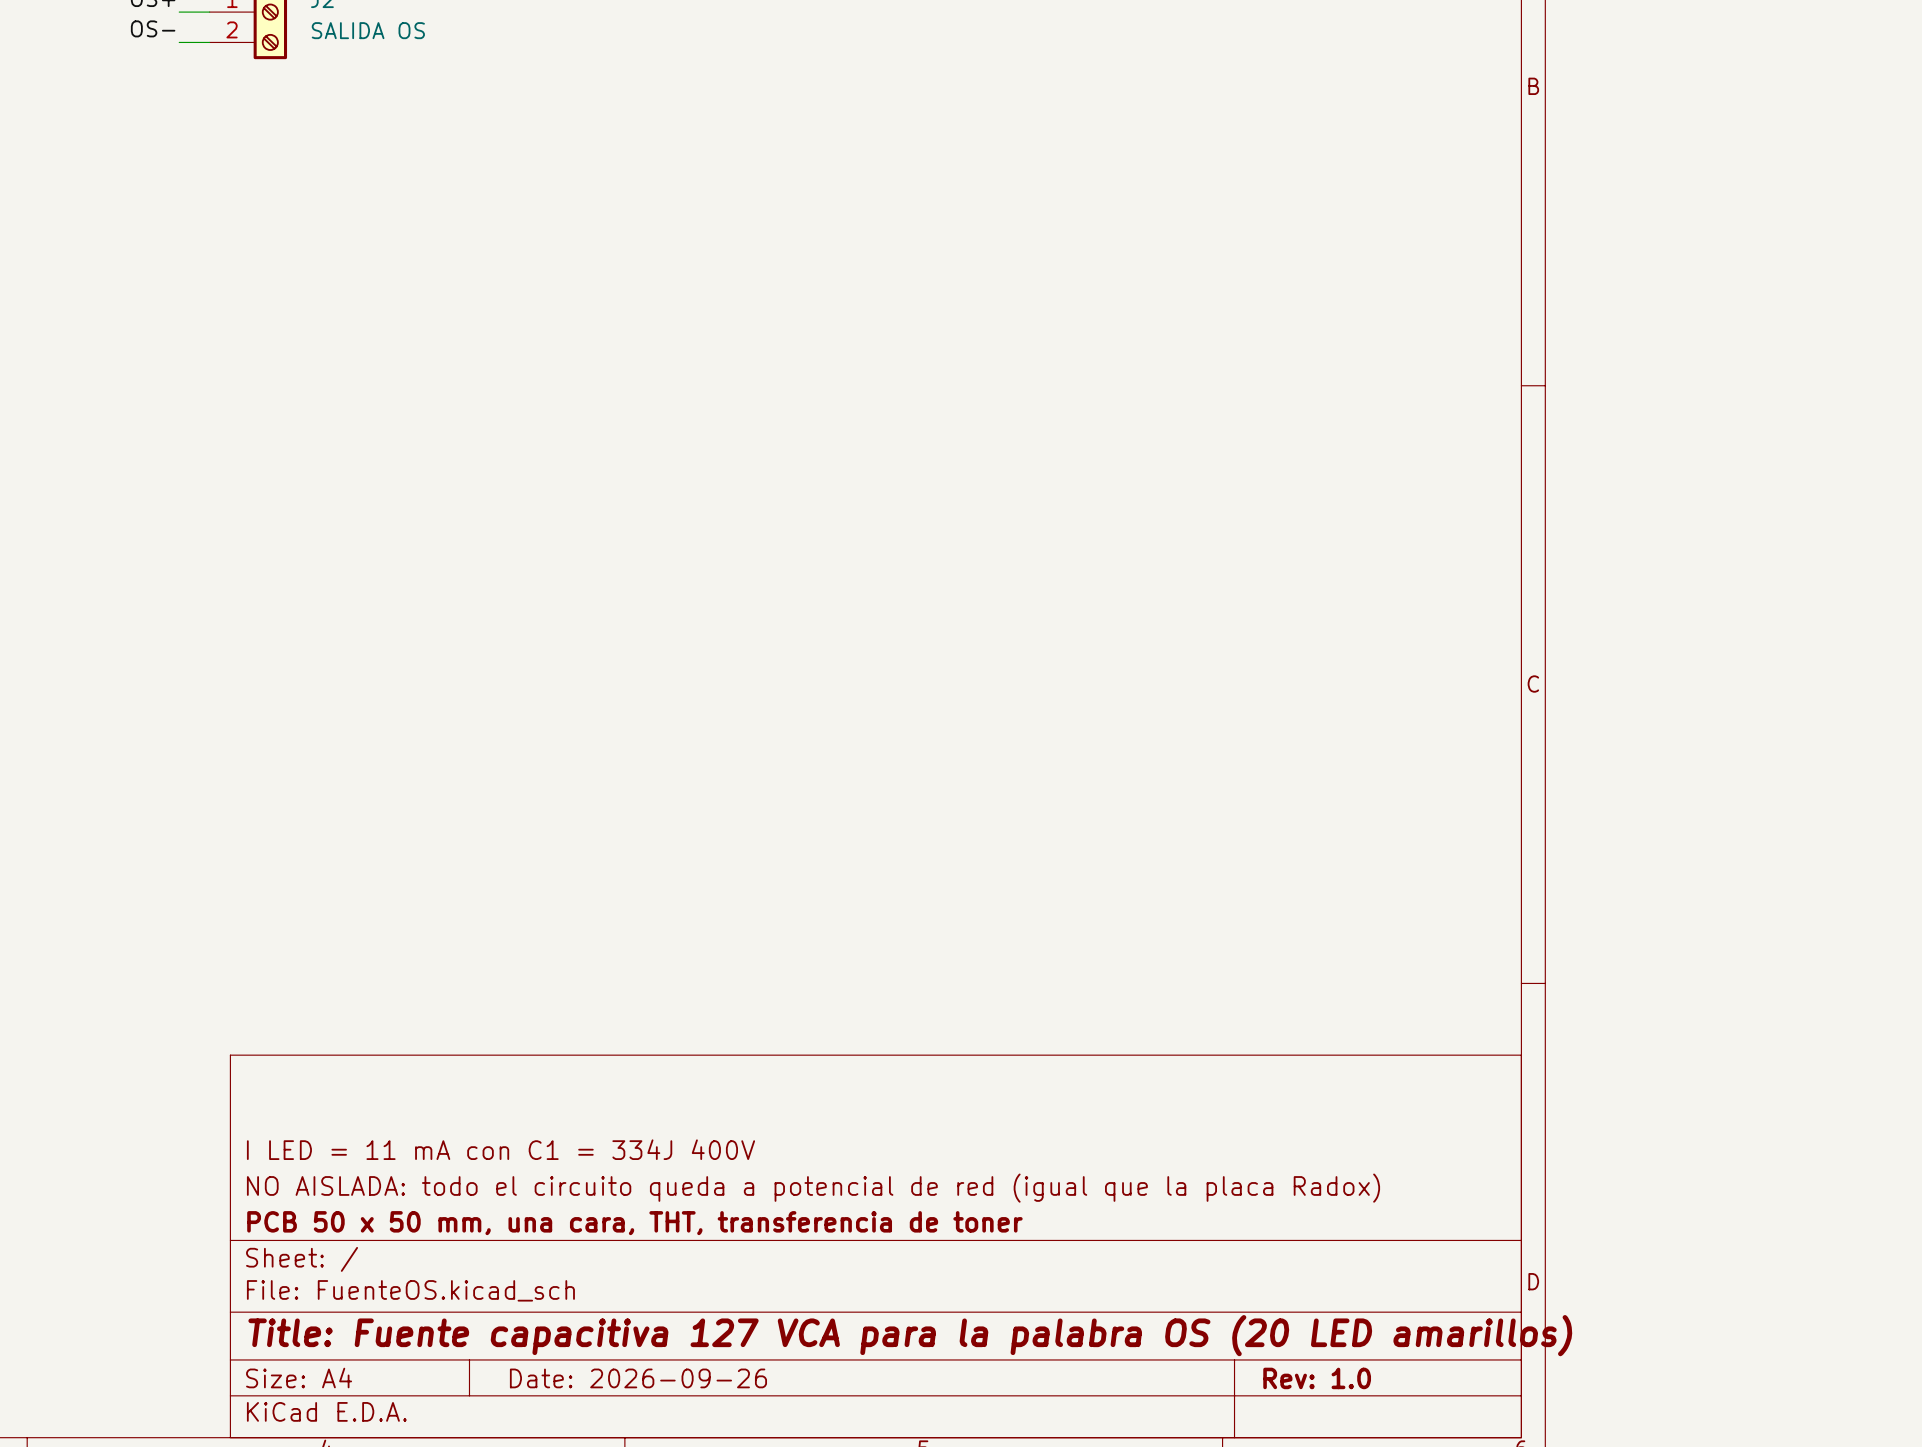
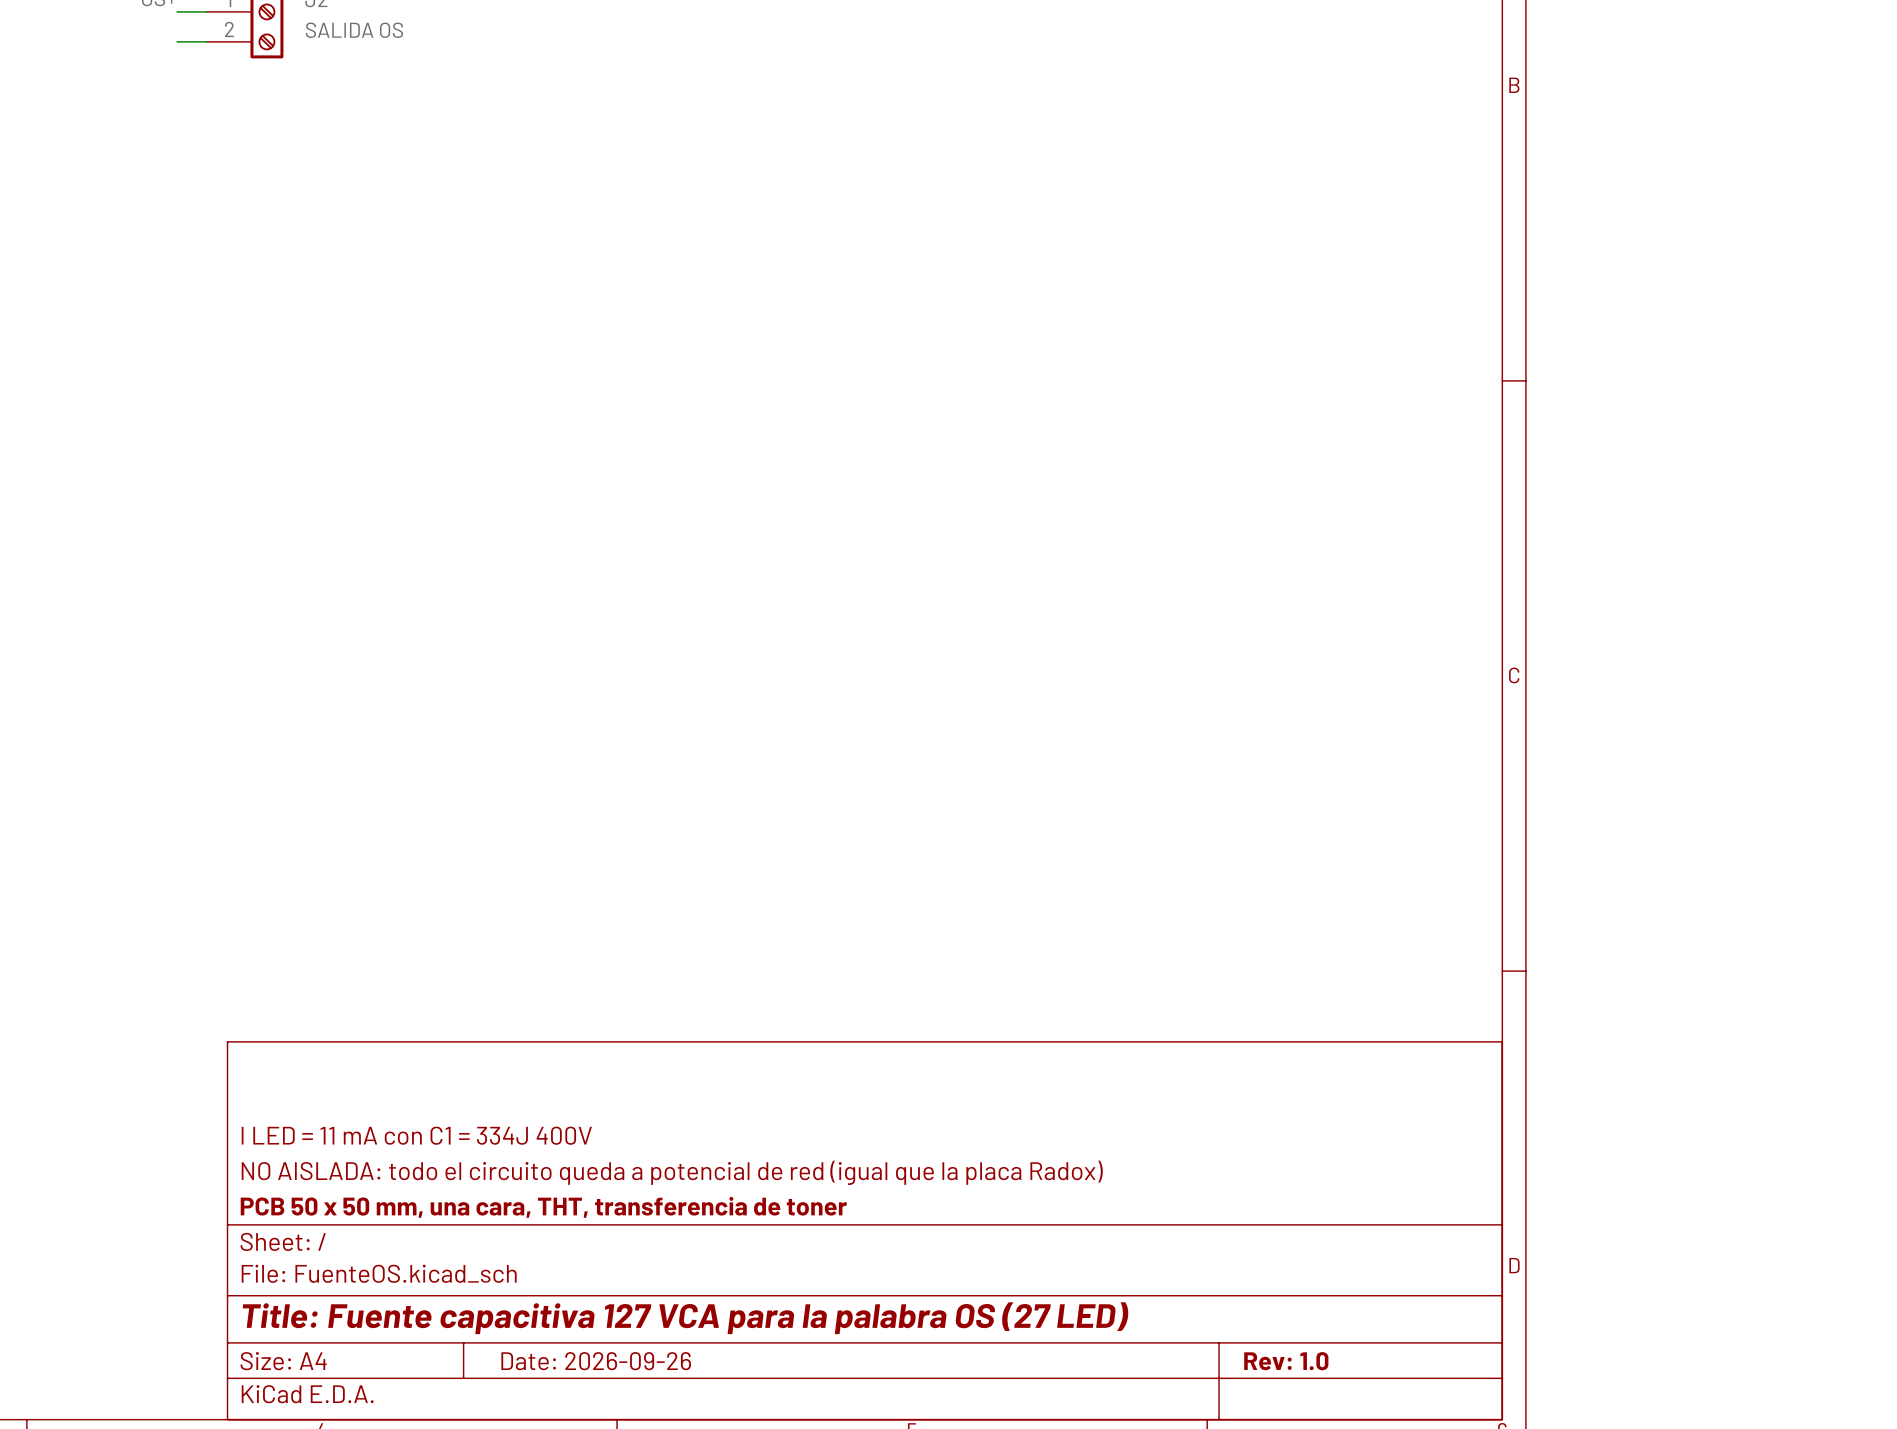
label: OS- (153, 28) -> none
title block: Title: Fuente capacitiva 127 VCA para la palabra OS (20 LED amarillos) (910, 1335) -> Title: Fuente capacitiva 127 VCA para la palabra OS (27 LED) (685, 1318)

